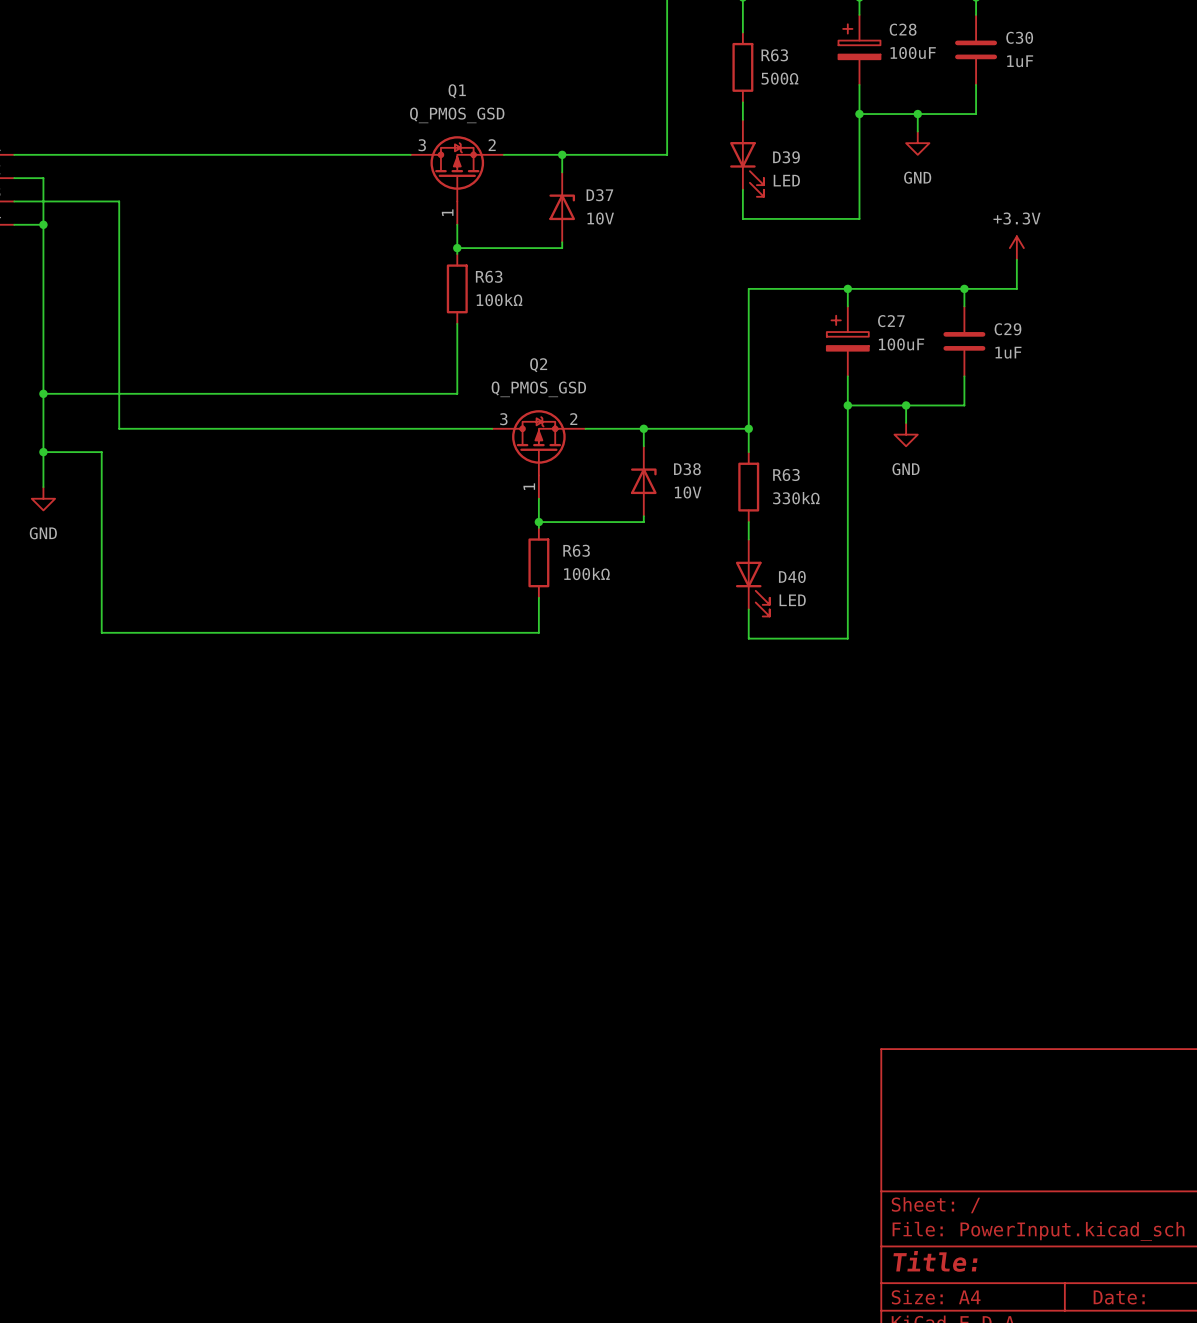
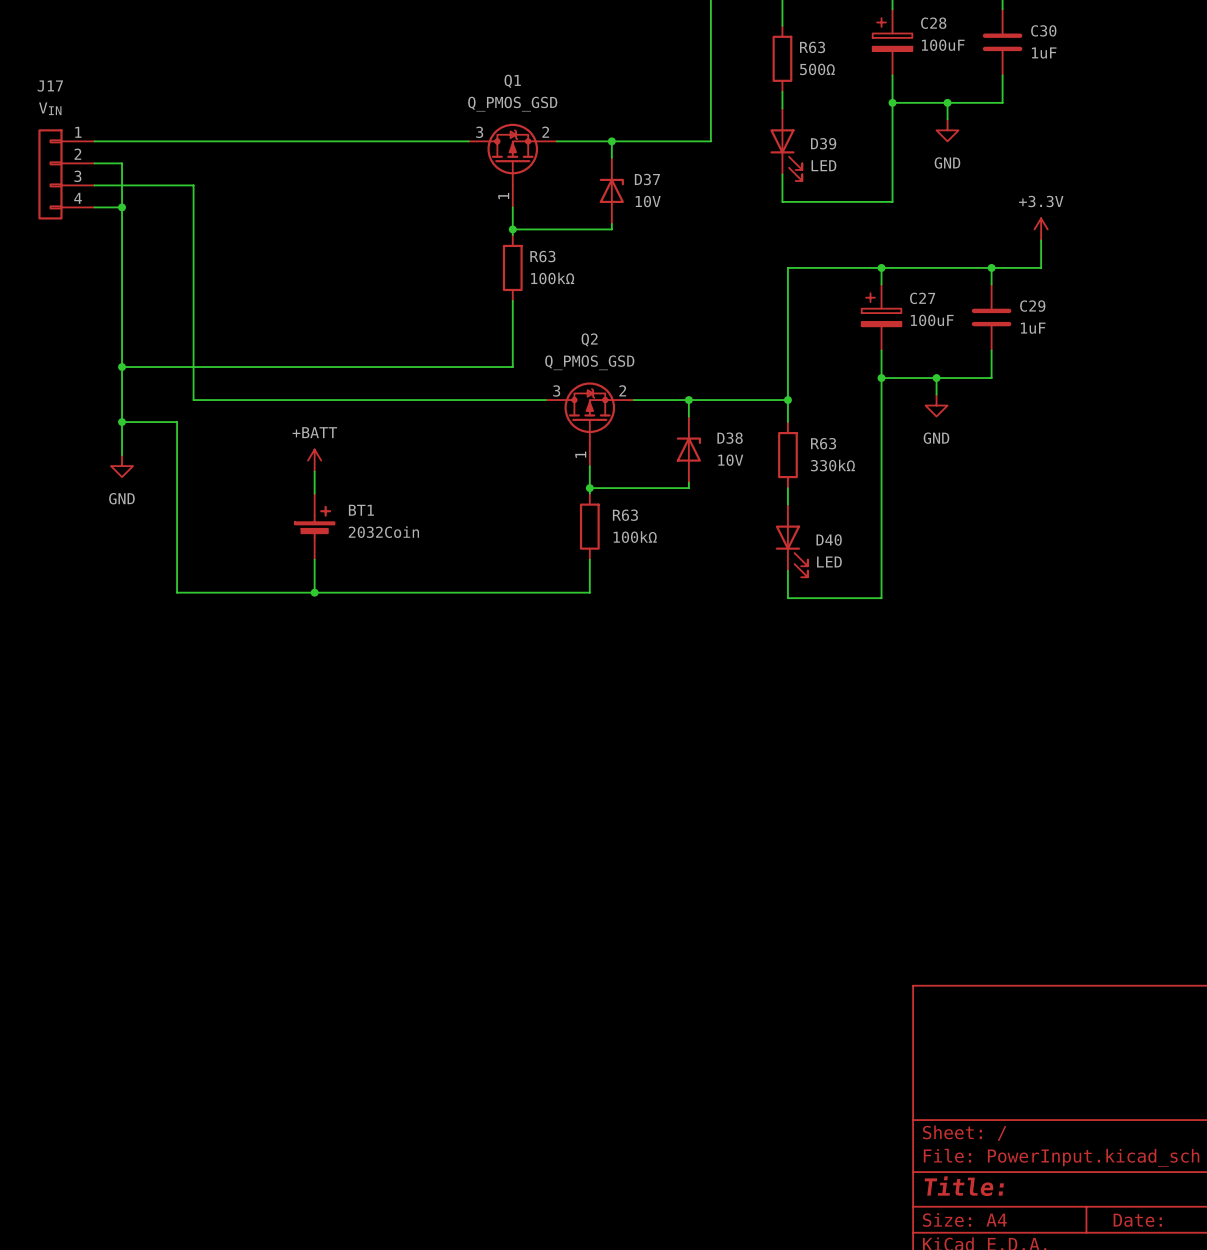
power symbol: none -> +BATT (314, 460)
wire: none -> (314, 471) (314, 493)
BT1: none -> 2032Coin (314, 526)
wire: none -> (314, 559) (314, 592)
junction: none -> (314, 592)

